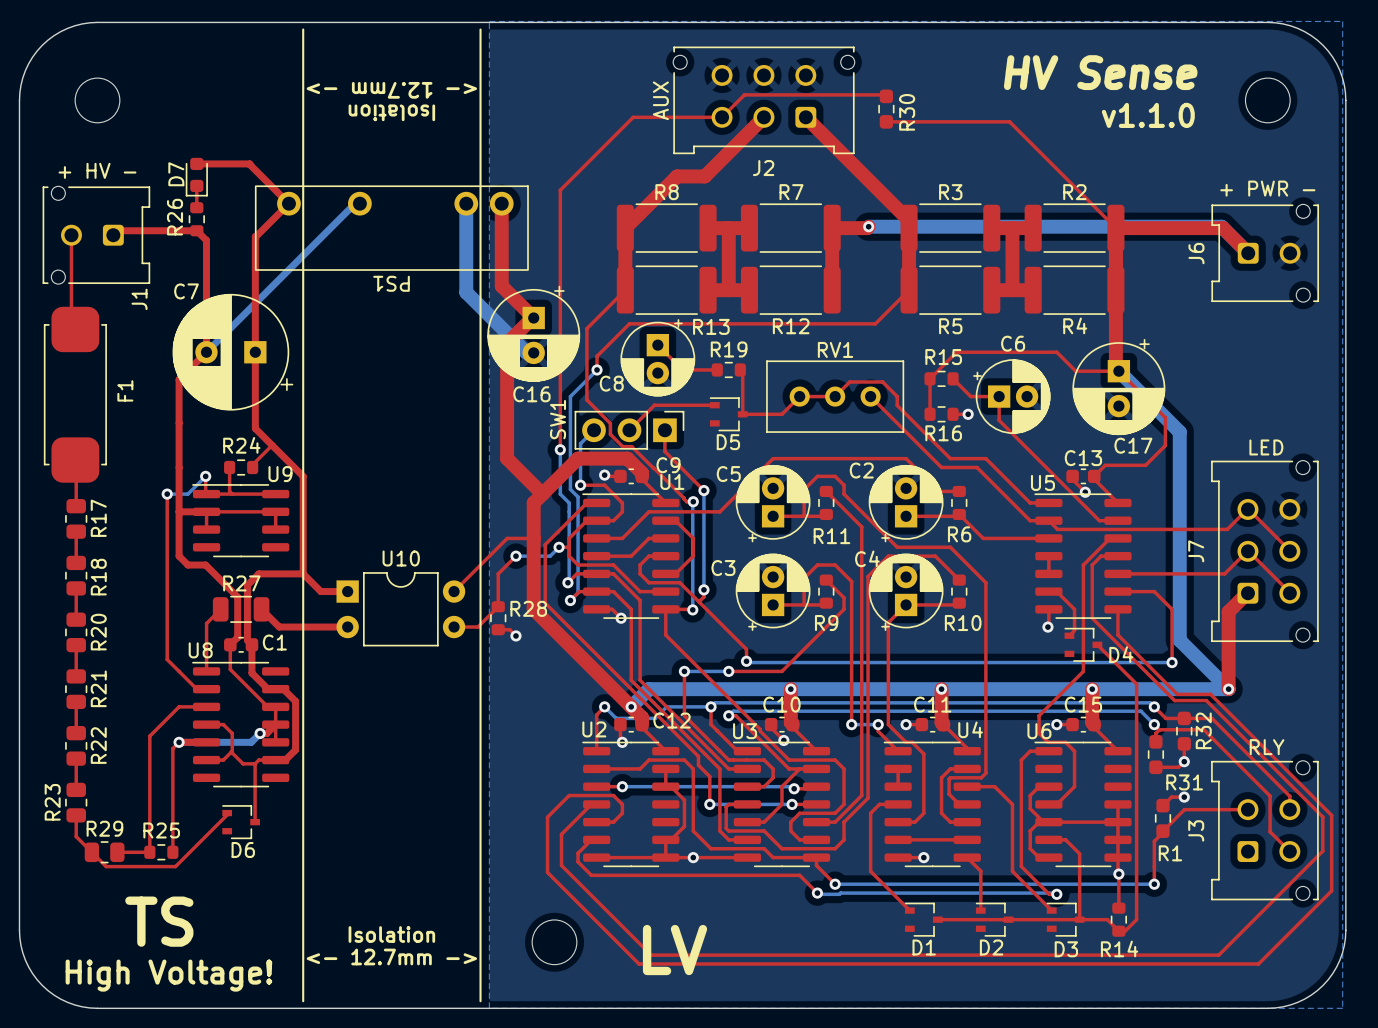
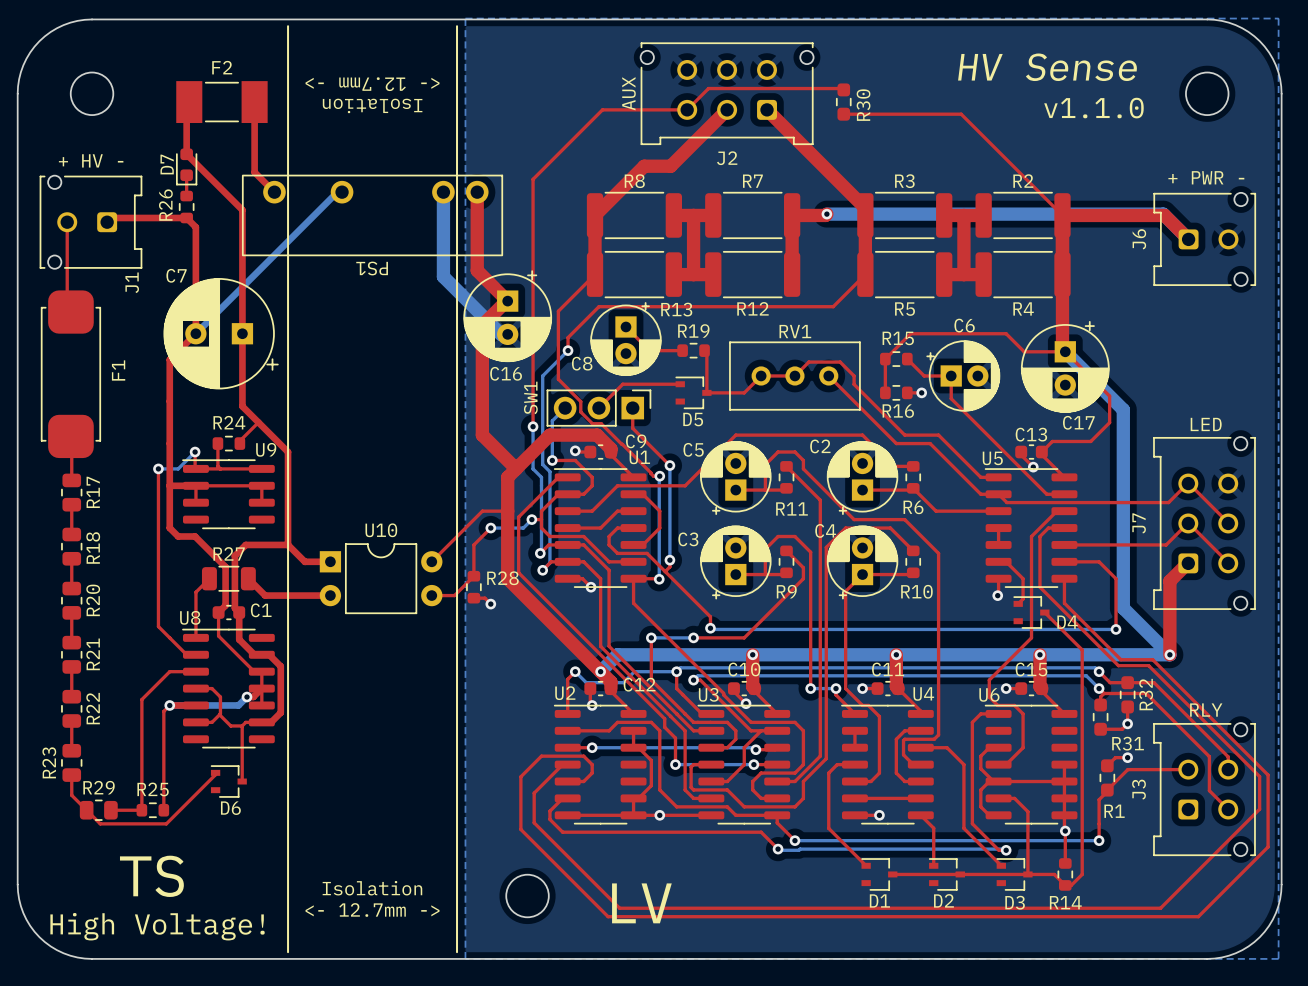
F2: none -> (221, 102)
top track: (196, 163) (249, 163) (268, 182) -> (254, 102) (254, 172)
top track: (288, 203) (255, 236) -> (189, 102) (186, 104) (186, 154) (242, 210) (242, 223)

